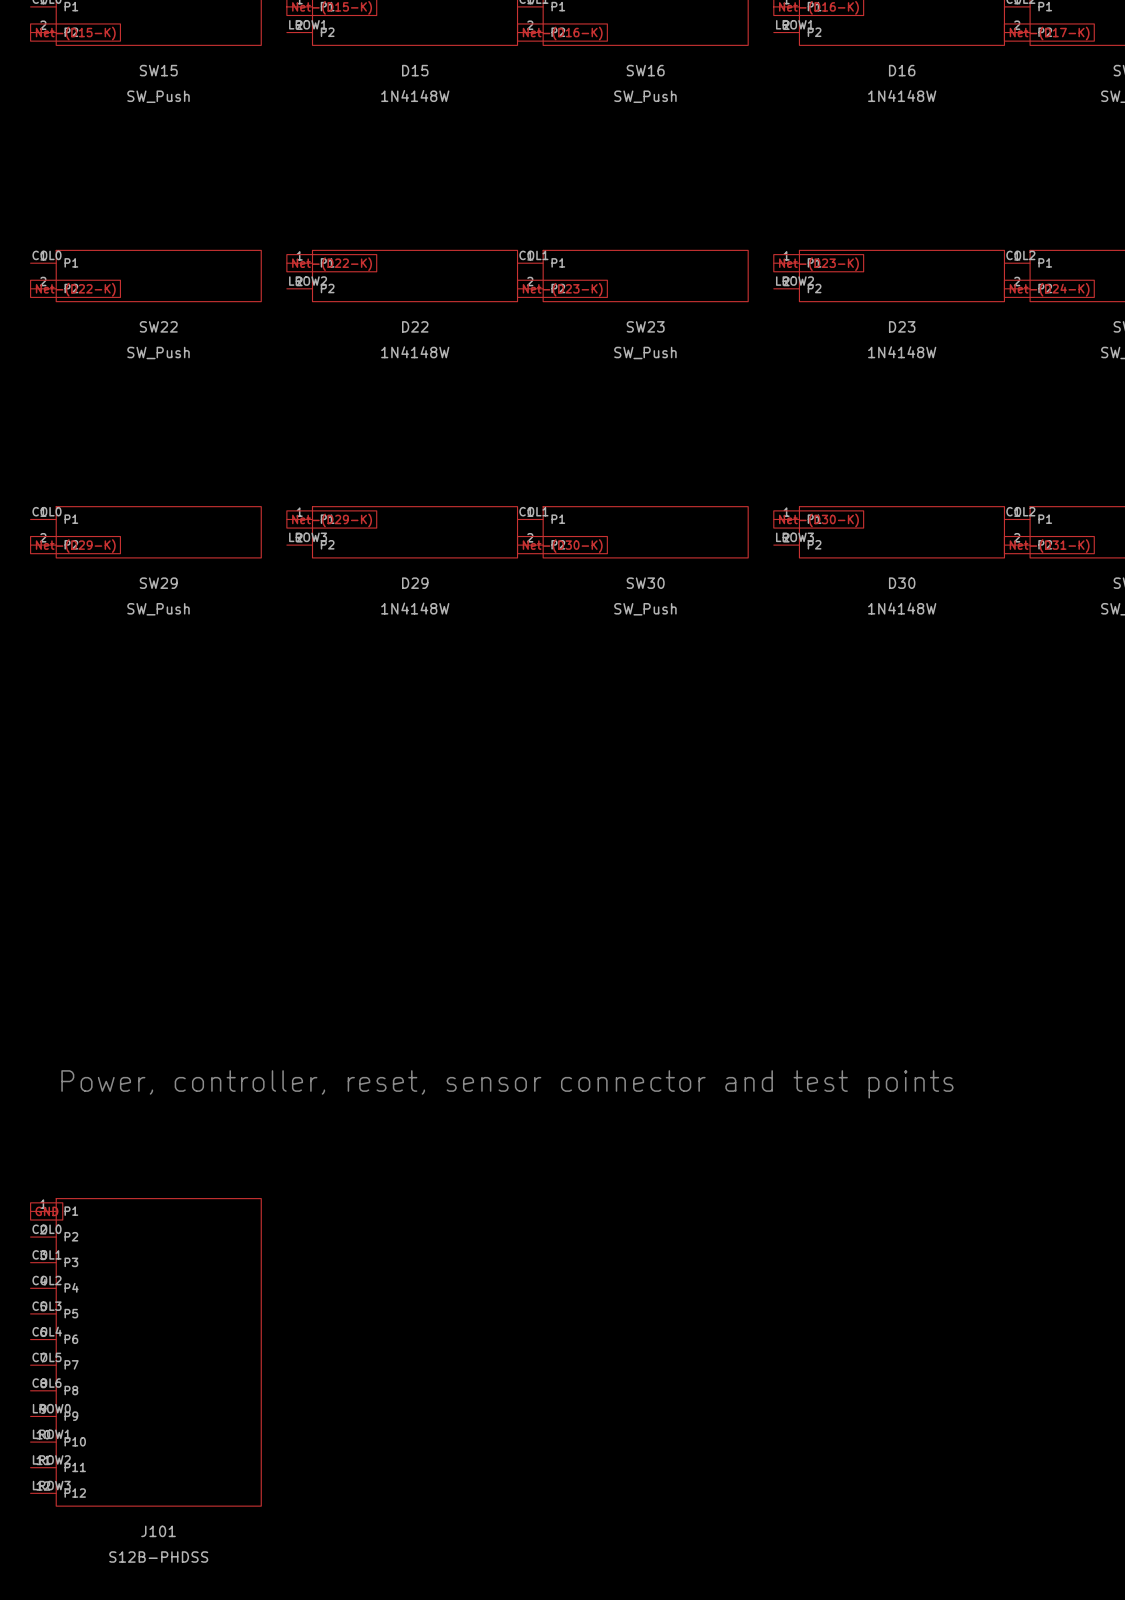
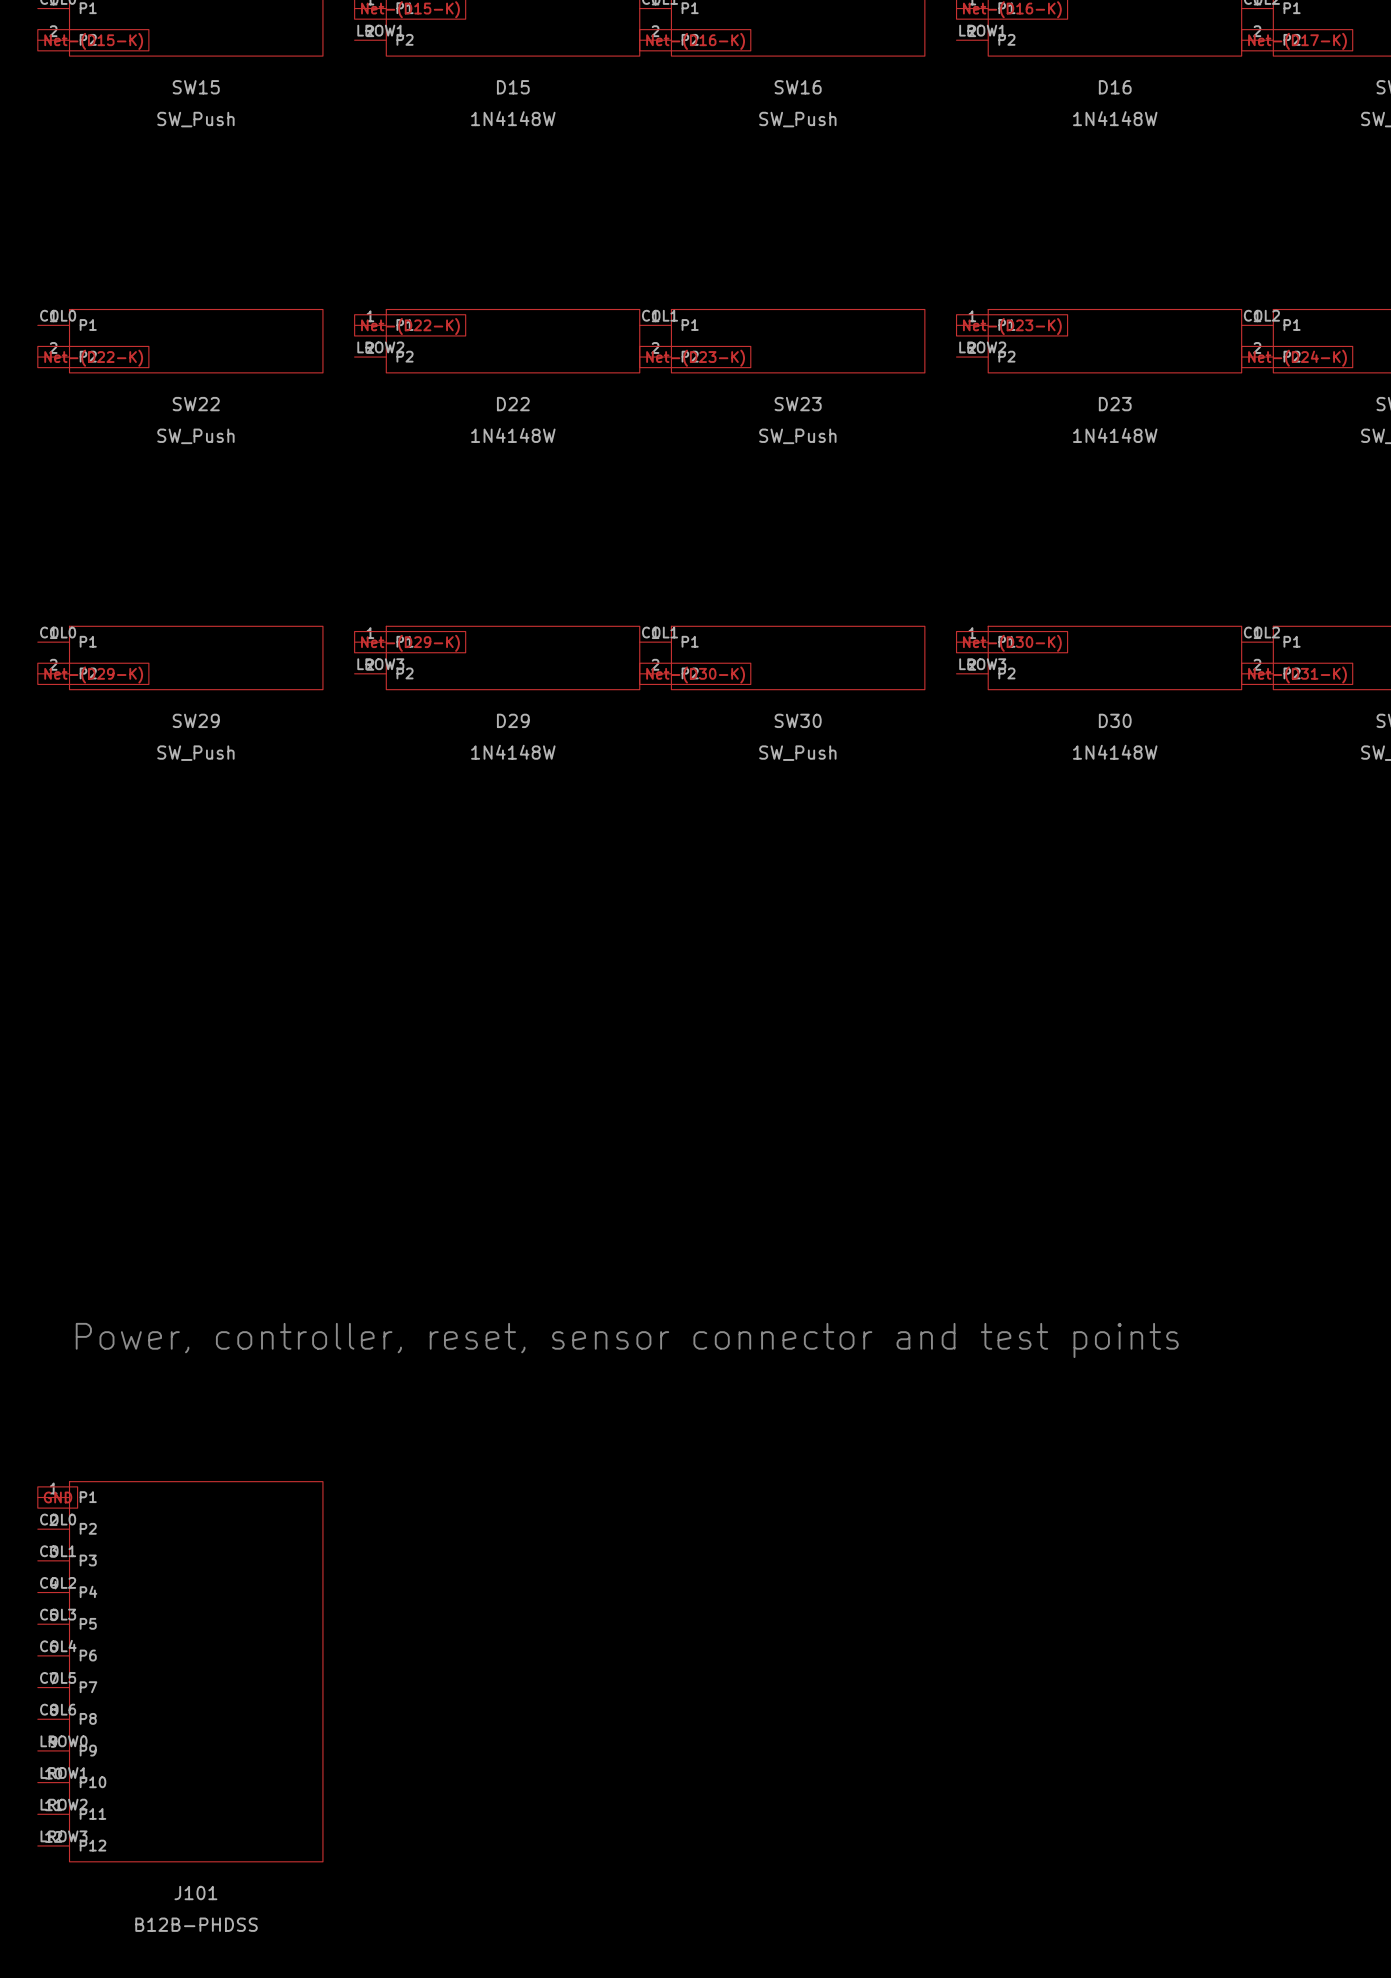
J101 value: S12B-PHDSS (158, 1557) -> B12B-PHDSS (196, 1924)

